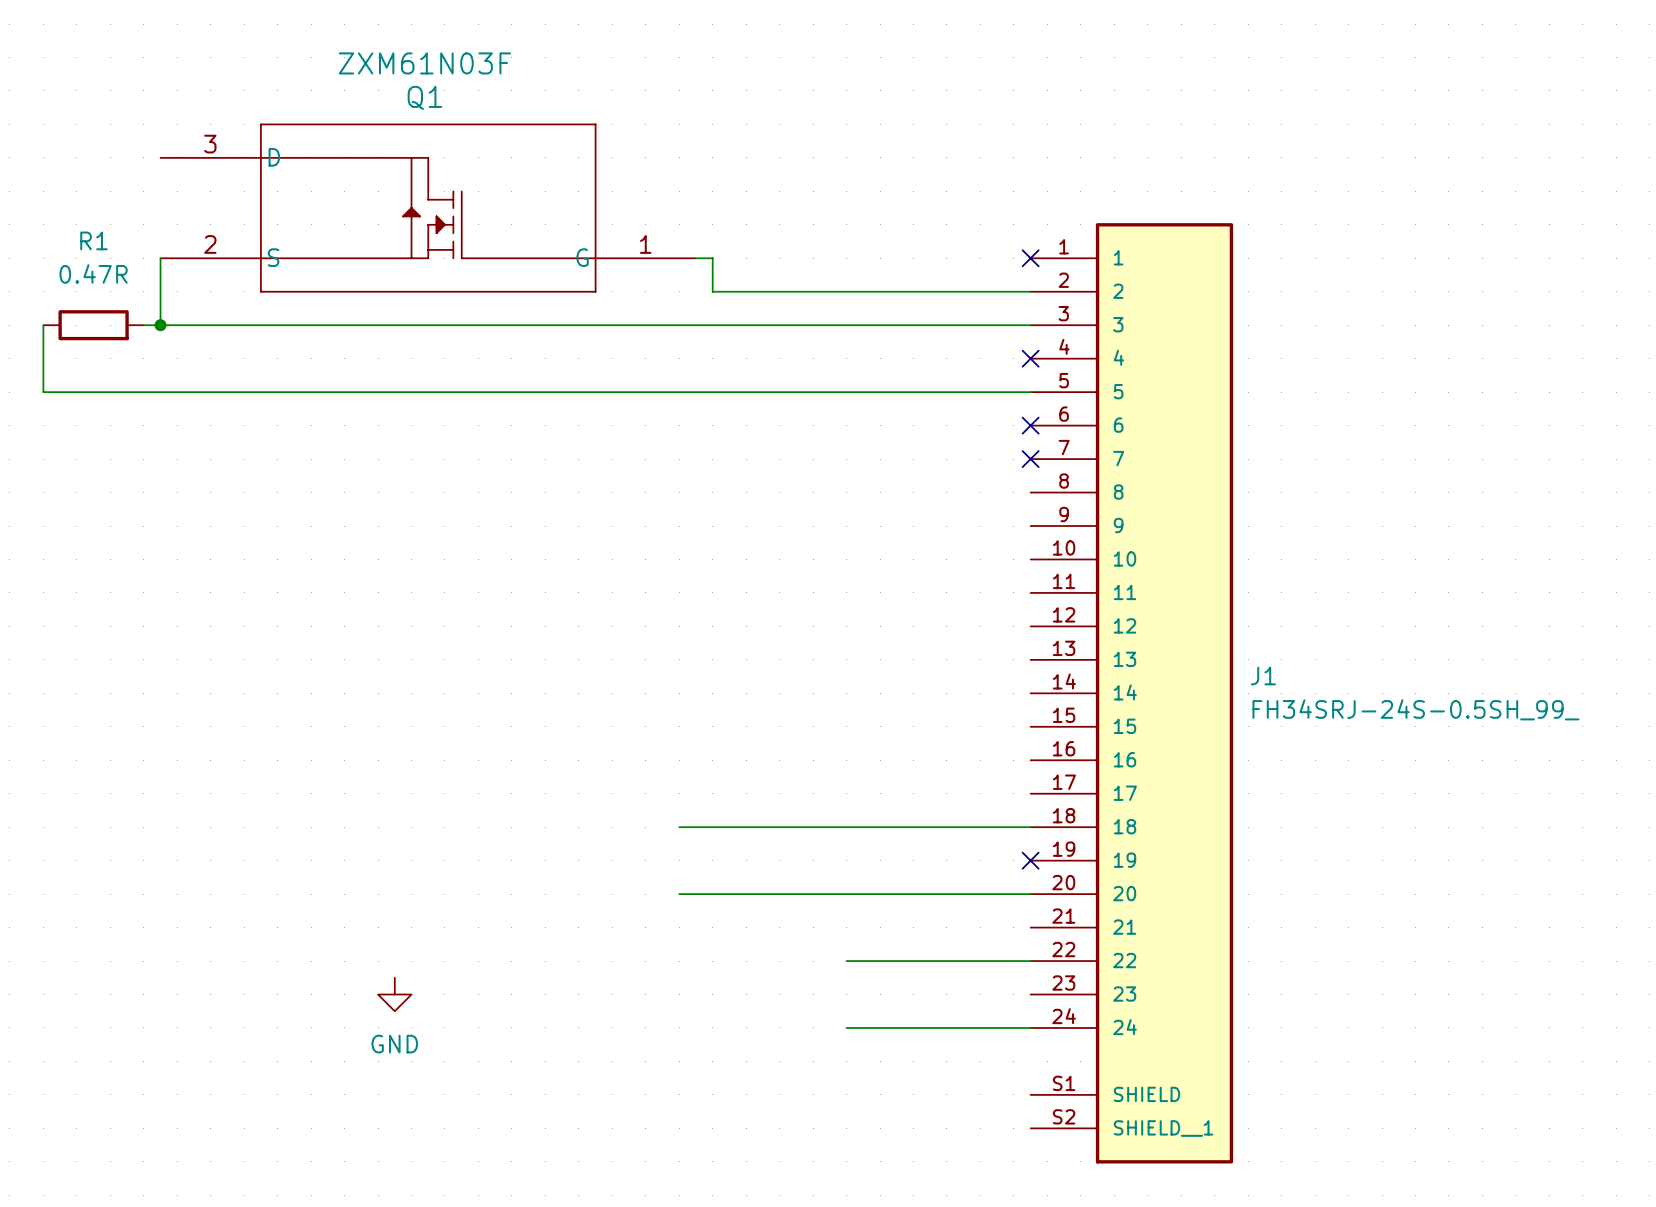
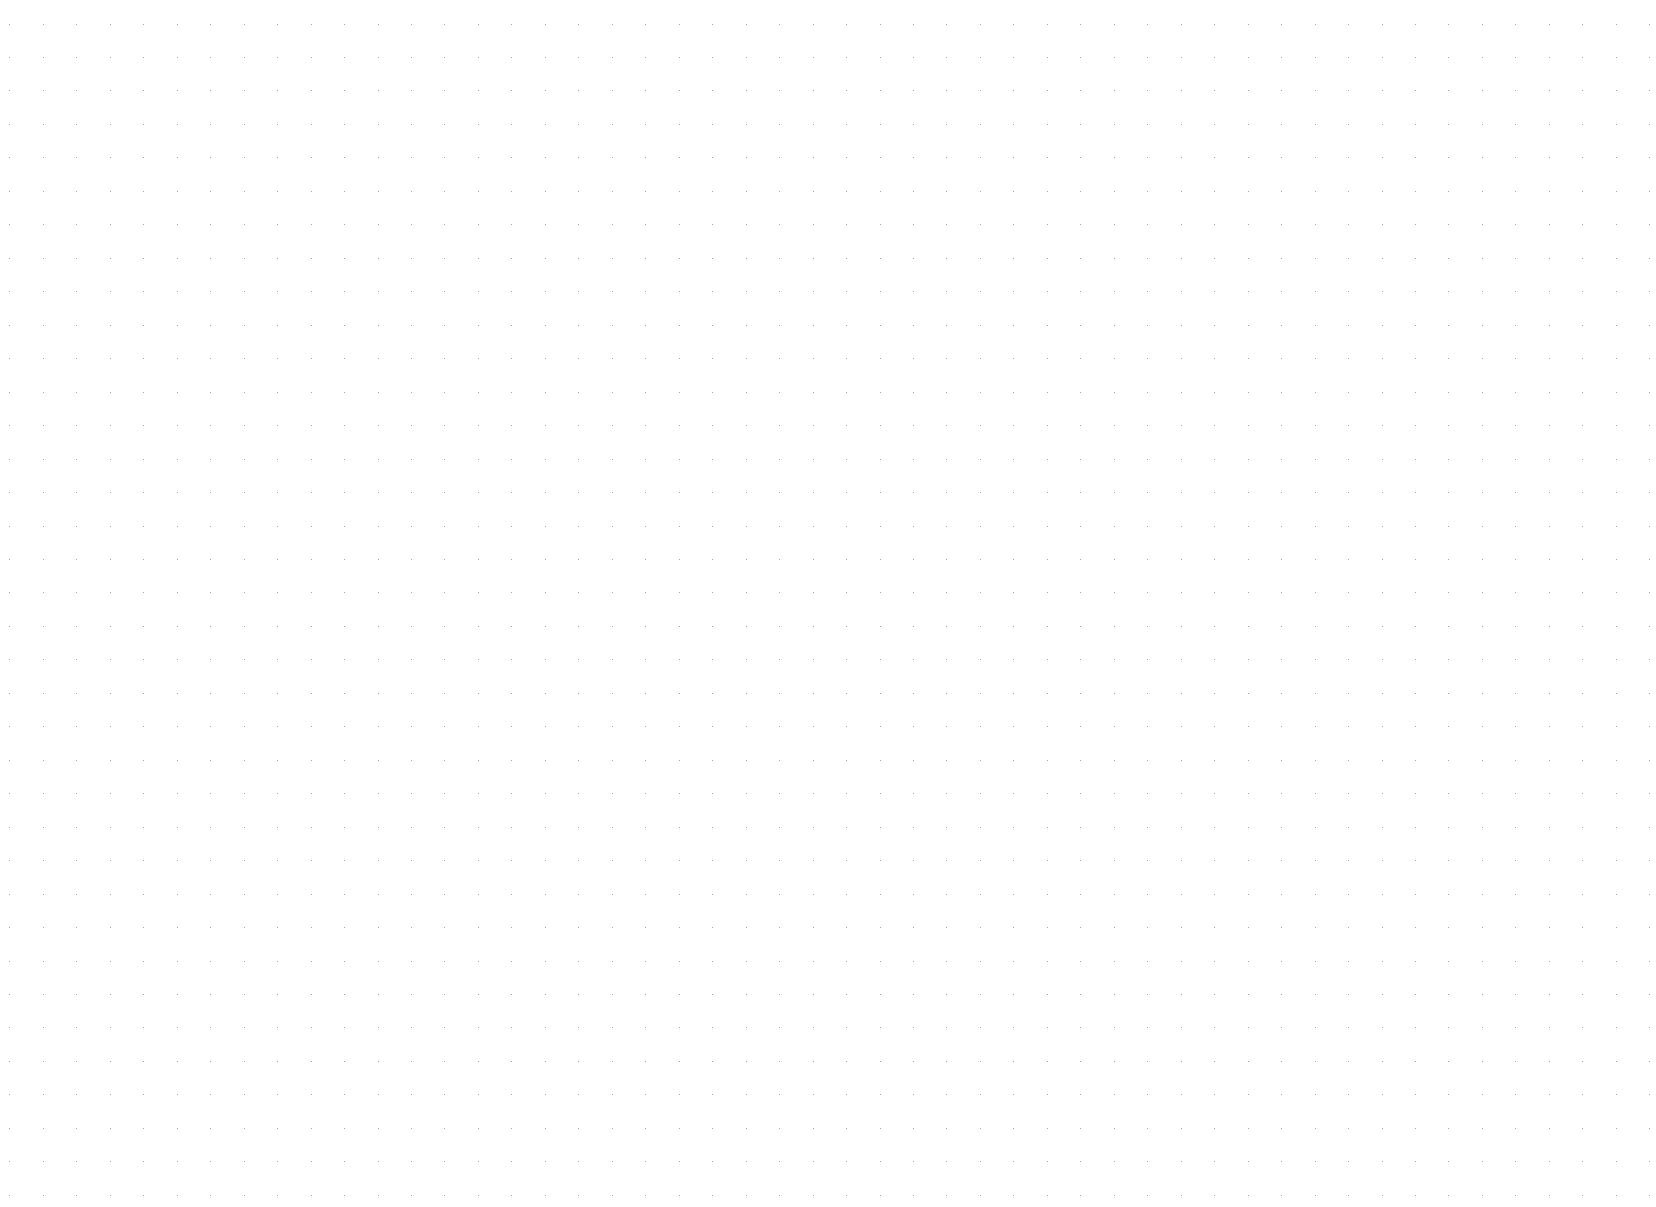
Q1: ZXM61N03F (428, 208) -> none
wire: (160, 258) (160, 325) -> none
wire: (695, 258) (712, 258) (712, 291) (1030, 291) -> none
no-connect mark: (1030, 258) -> none
wire: (43, 325) (43, 392) (1030, 392) -> none
R1: 0.47R (93, 325) -> none
wire: (143, 325) (1030, 325) -> none
junction: (160, 325) -> none
no-connect mark: (1030, 358) -> none
no-connect mark: (1030, 425) -> none
no-connect mark: (1030, 459) -> none
J1: FH34SRJ-24S-0.5SH_99_ (1131, 693) -> none
wire: (679, 827) (1030, 827) -> none
no-connect mark: (1030, 860) -> none
wire: (679, 894) (1030, 894) -> none
wire: (846, 961) (1030, 961) -> none
power symbol: GND (394, 994) -> none
wire: (846, 1027) (1030, 1027) -> none

